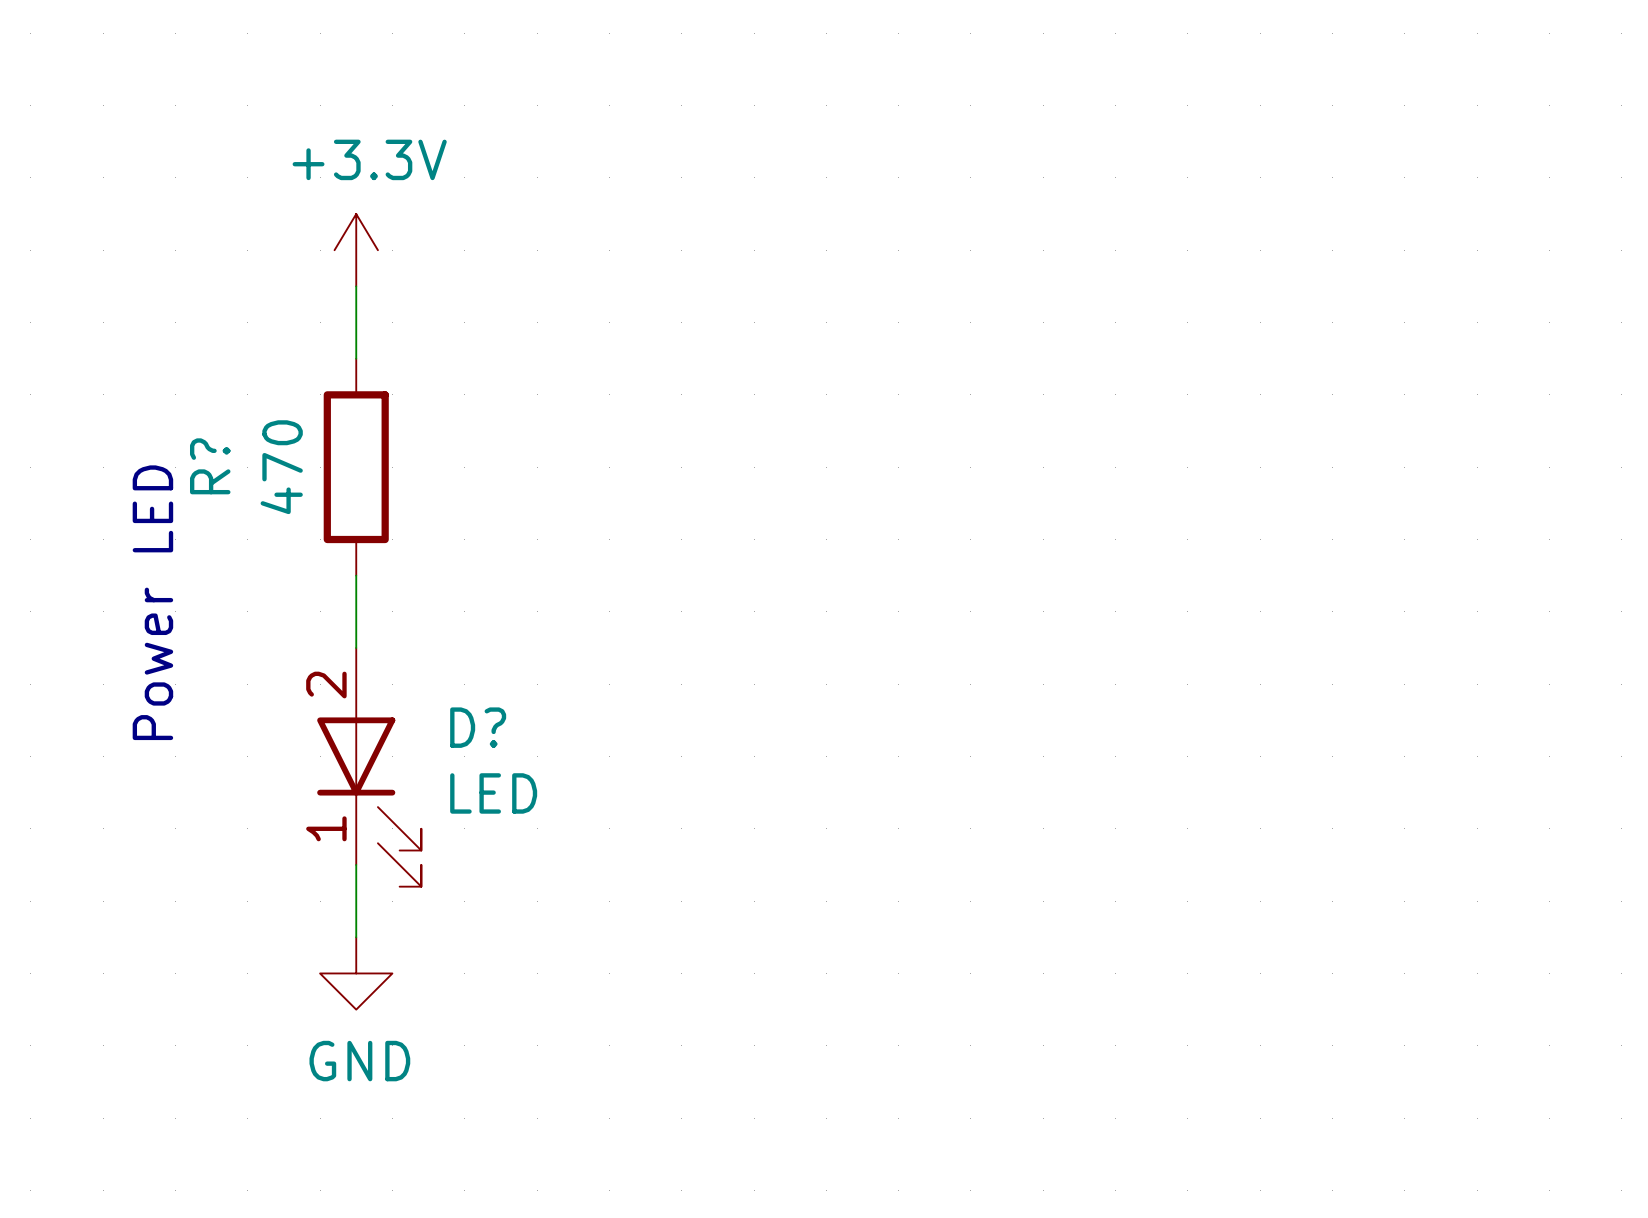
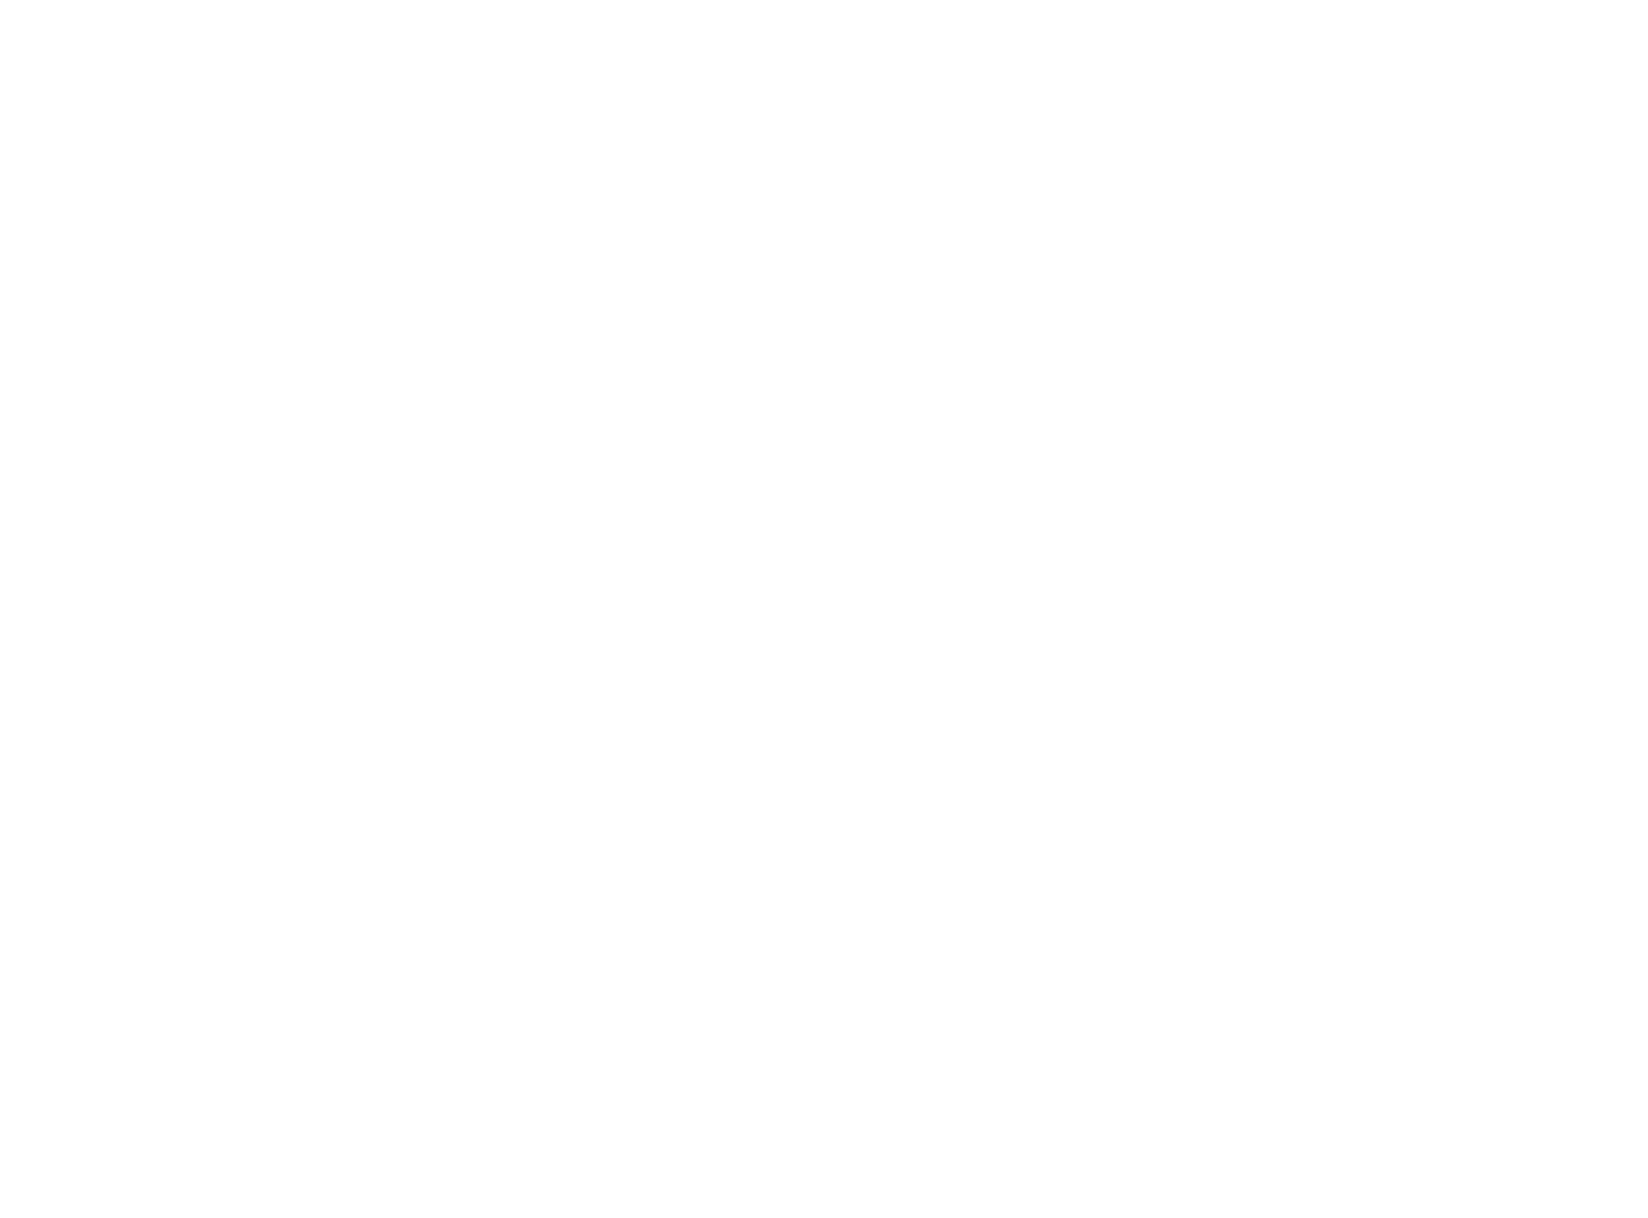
power symbol: +3.3V (356, 250) -> none
wire: (356, 286) (356, 358) -> none
R?: 470 (356, 467) -> none
wire: (356, 575) (356, 647) -> none
text: Power LED (152, 602) -> none
D?: LED (369, 767) -> none
wire: (356, 864) (356, 937) -> none
power symbol: GND (356, 973) -> none

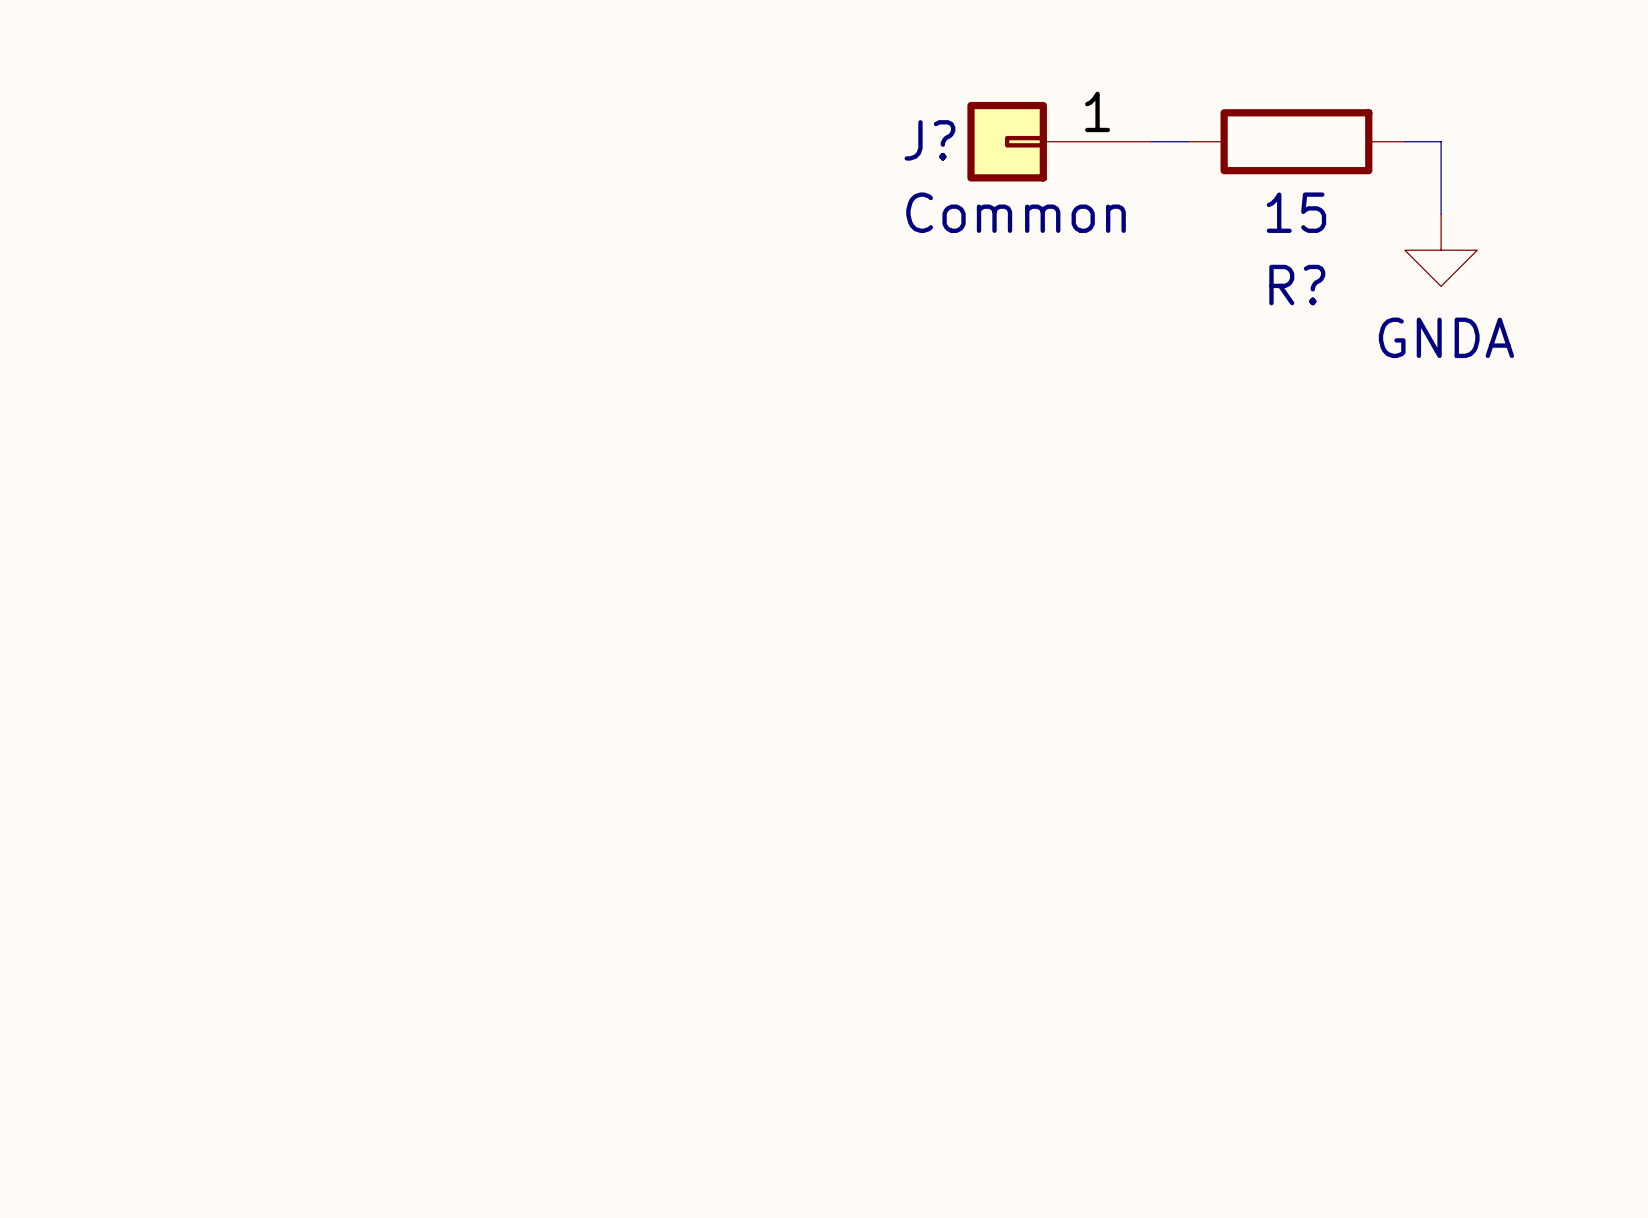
J?: none -> Common (1059, 141)
wire: none -> (1151, 141) (1187, 141)
R?: none -> 15 (1296, 141)
wire: none -> (1404, 141) (1441, 141) (1441, 214)
power symbol: none -> GNDA (1441, 250)

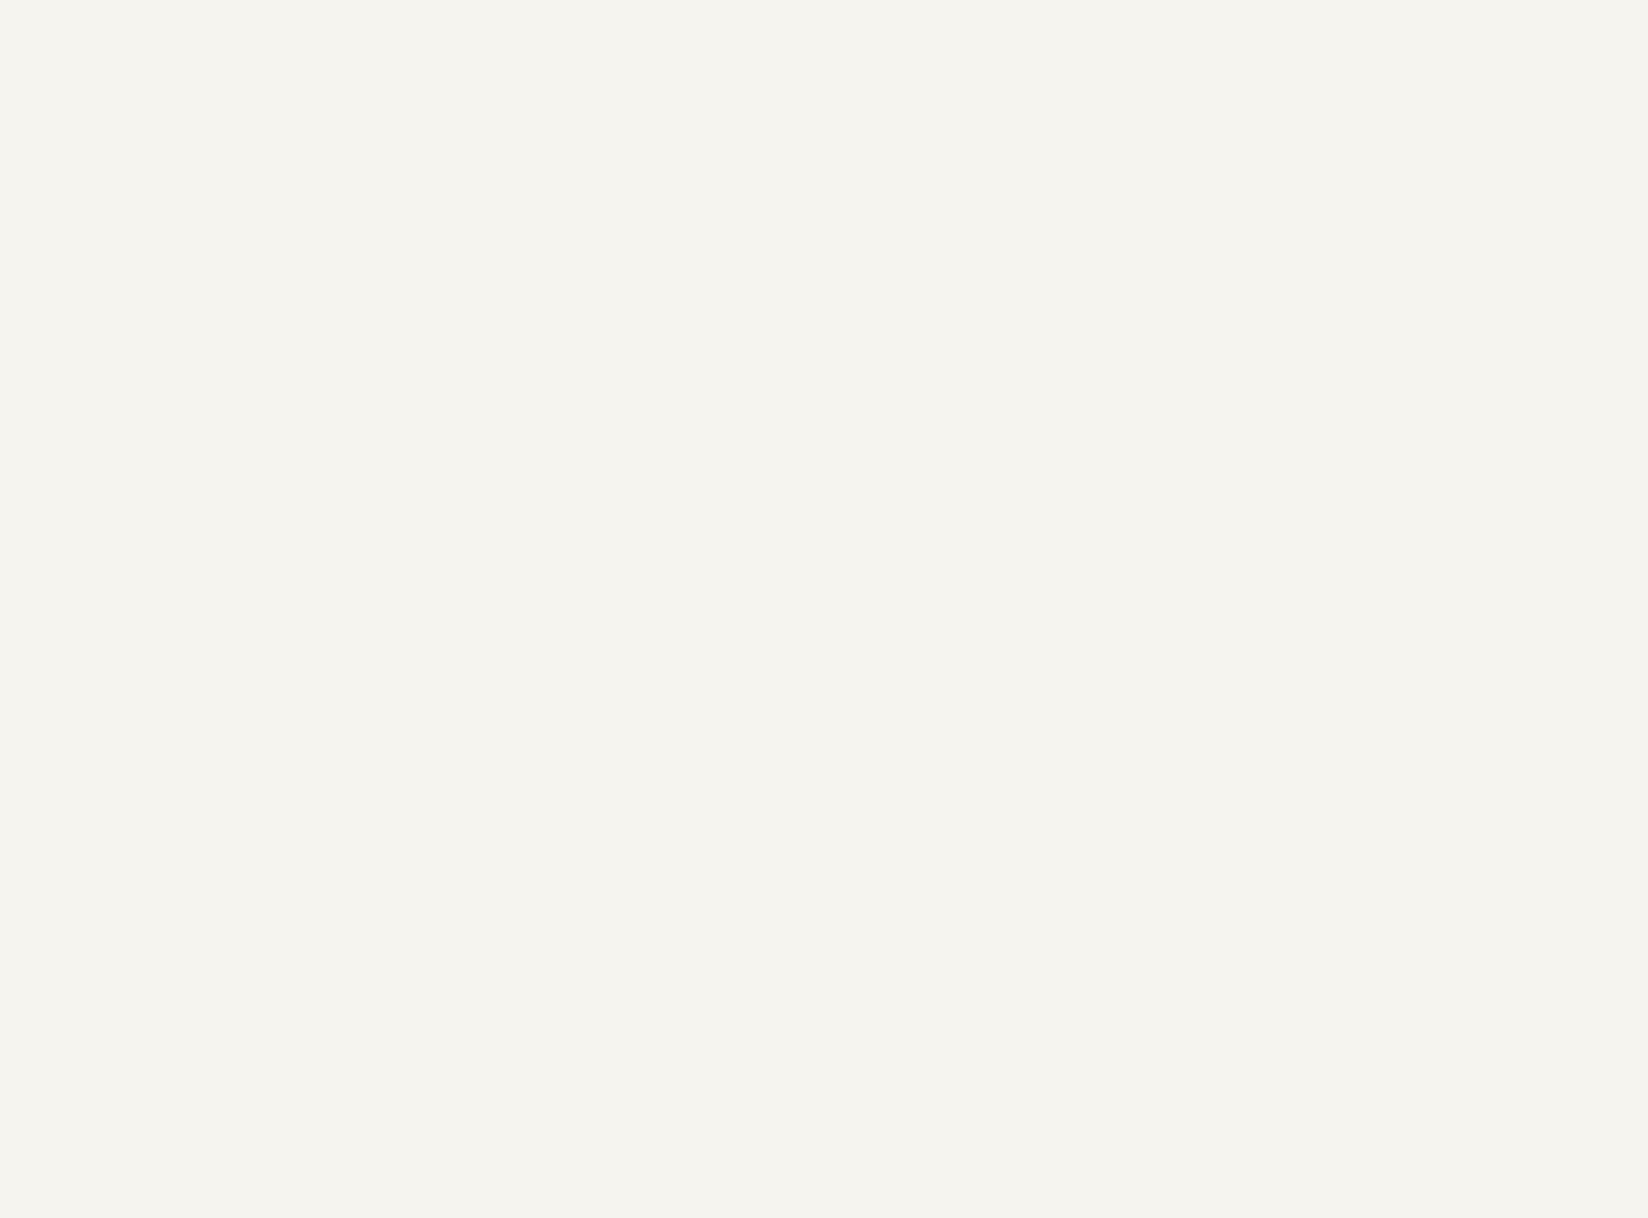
J?: Common (1059, 141) -> none
wire: (1151, 141) (1187, 141) -> none
R?: 15 (1296, 141) -> none
wire: (1404, 141) (1441, 141) (1441, 214) -> none
power symbol: GNDA (1441, 250) -> none

